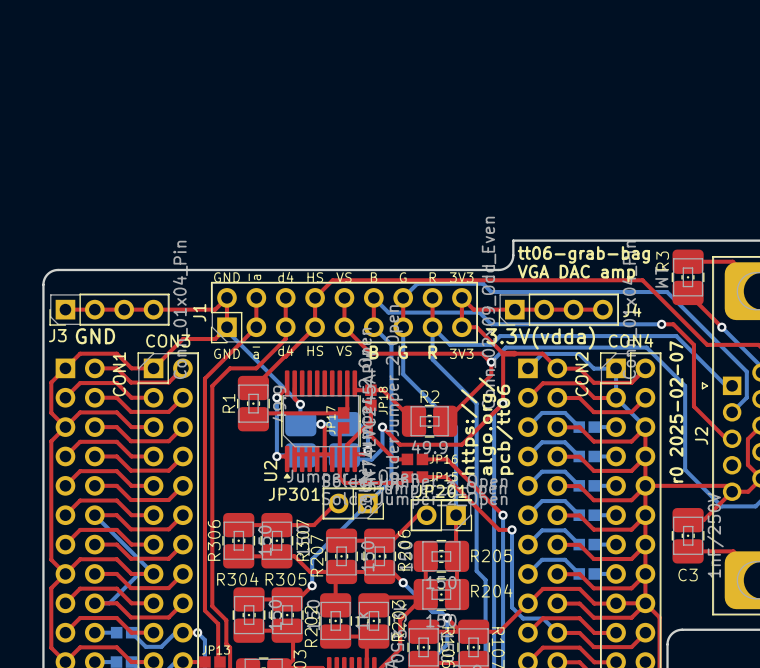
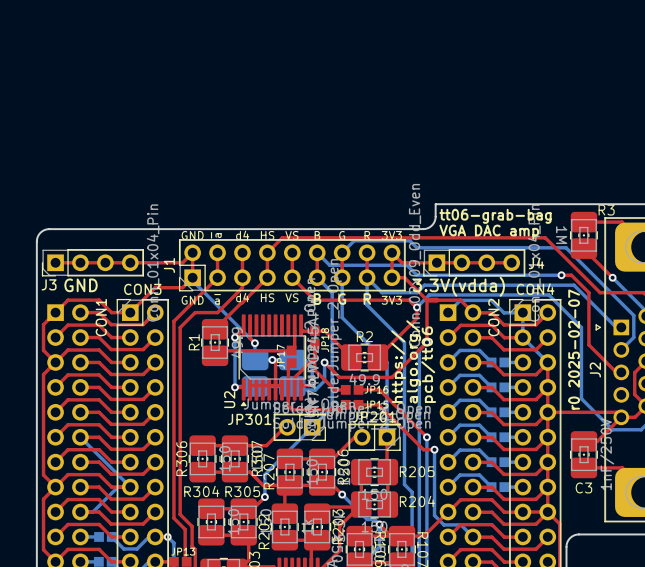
R3 name rotation: 0° (662, 260) -> 90° clockwise (606, 210)
R3 name position: R3 (662, 260) -> R3 (606, 210)

